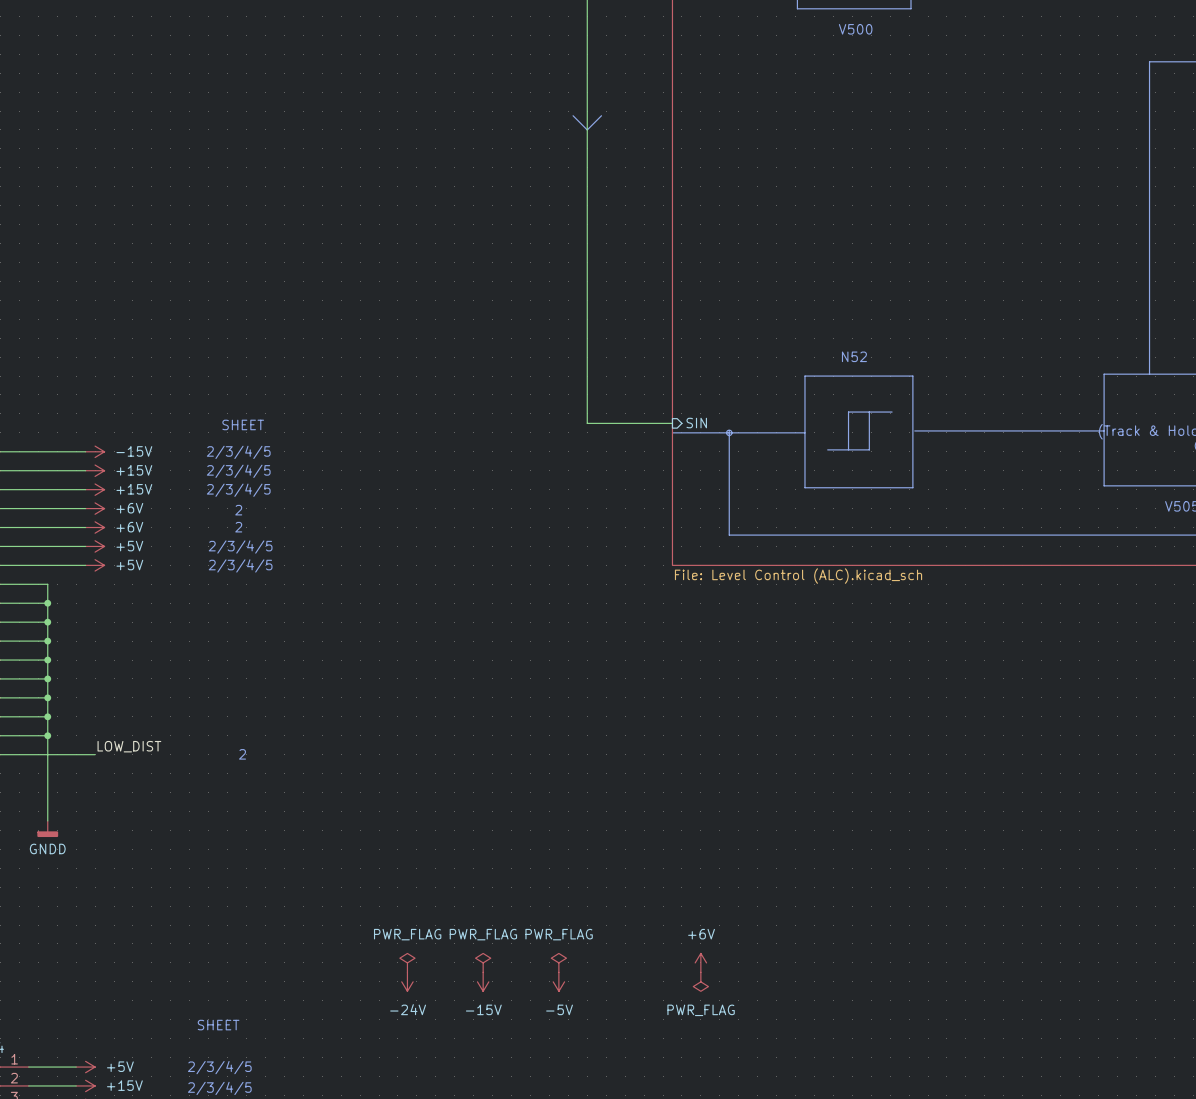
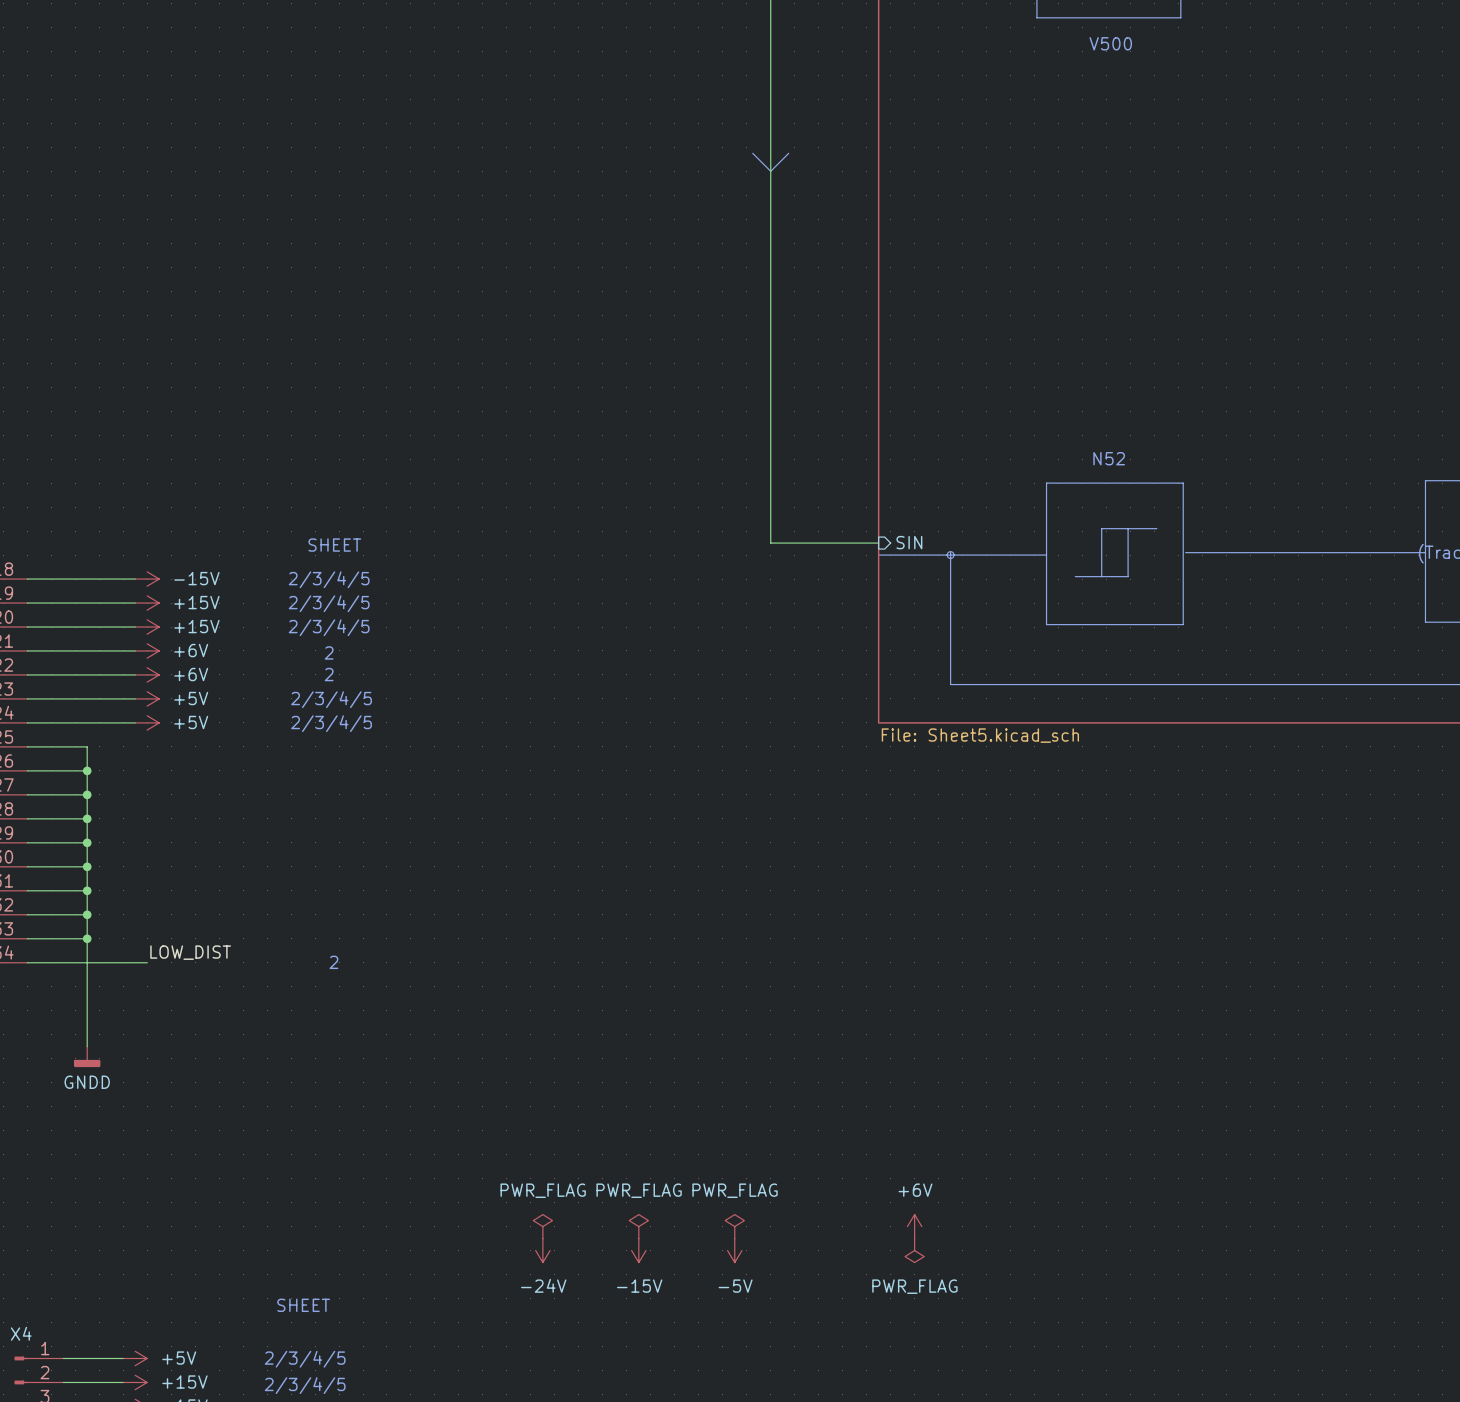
sheet value: File: Level Control (ALC).kicad_sch (798, 576) -> File: Sheet5.kicad_sch (980, 735)

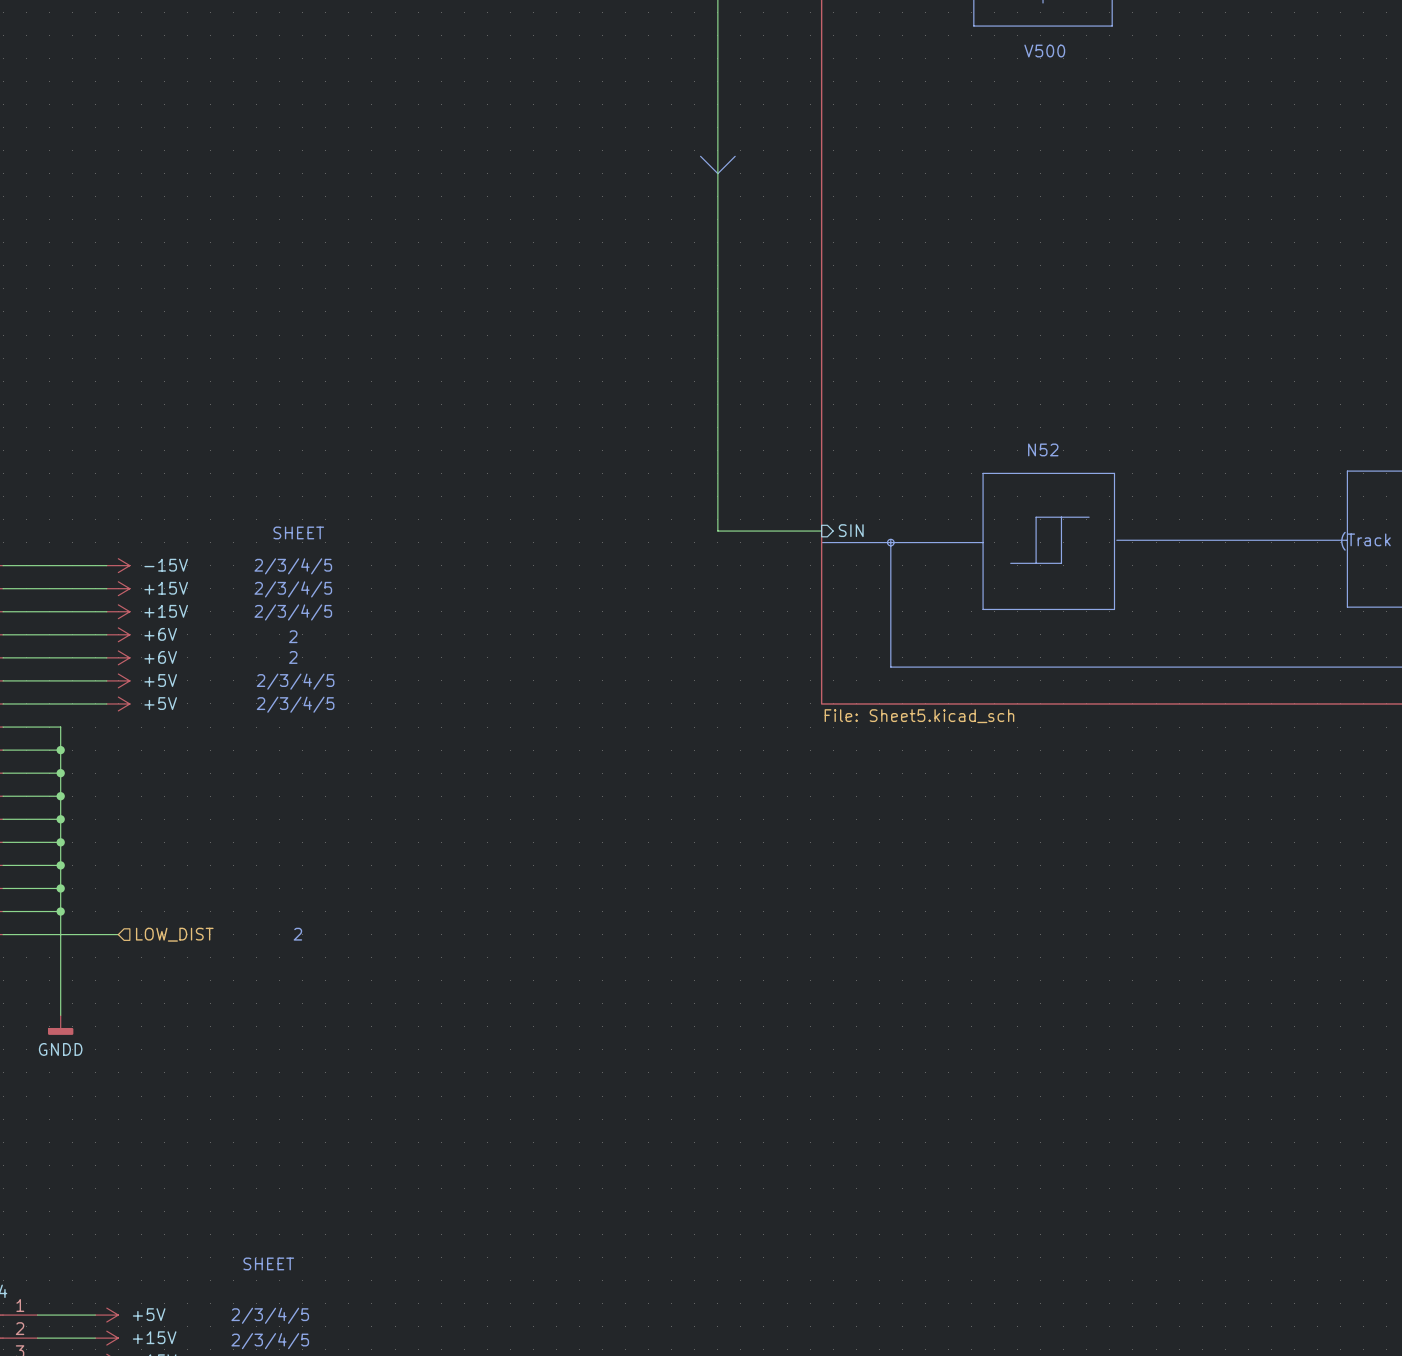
label: LOW_DIST (190, 952) -> none
hierarchical label: none -> LOW_DIST (174, 934)
power symbol: PWR_FLAG (542, 1226) -> none
power symbol: PWR_FLAG (638, 1226) -> none
power symbol: PWR_FLAG (734, 1226) -> none
power symbol: +6V (914, 1226) -> none
power symbol: -24V (542, 1250) -> none
power symbol: -15V (638, 1250) -> none
power symbol: -5V (734, 1250) -> none
power symbol: PWR_FLAG (914, 1250) -> none

